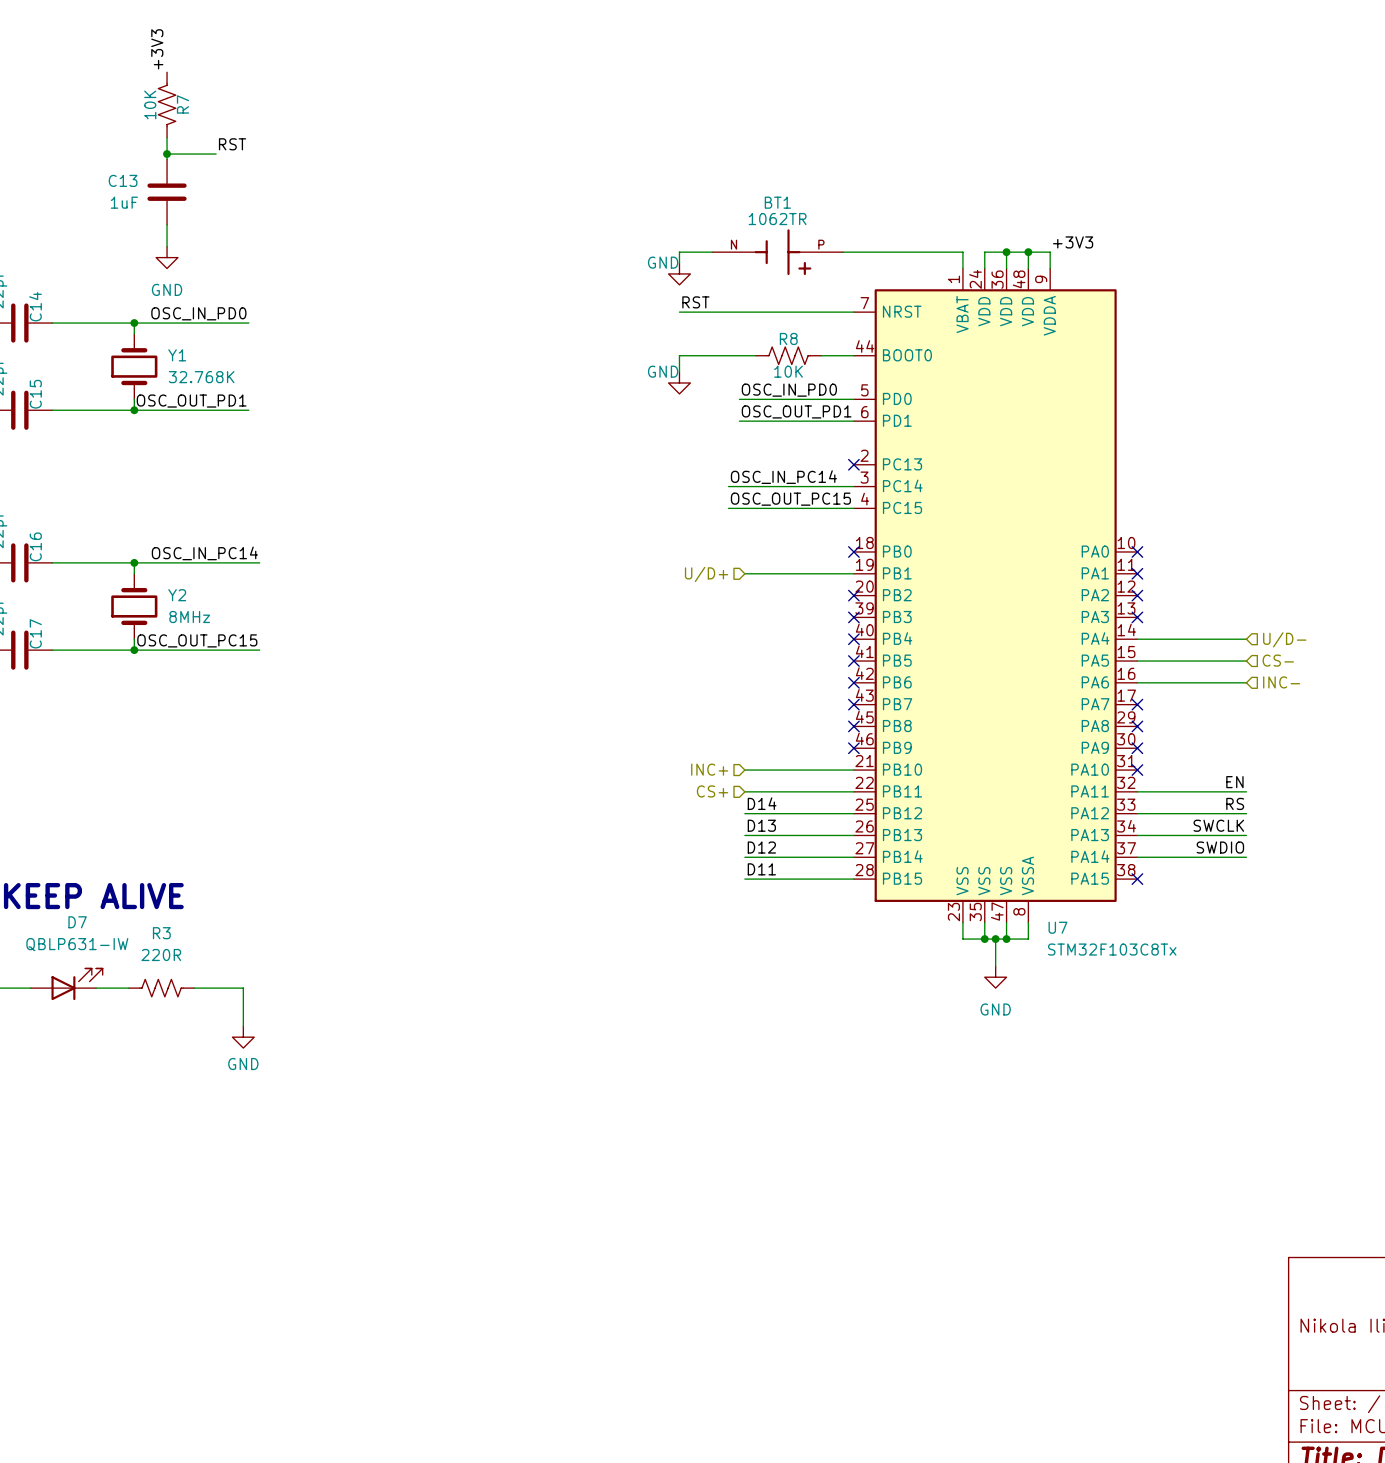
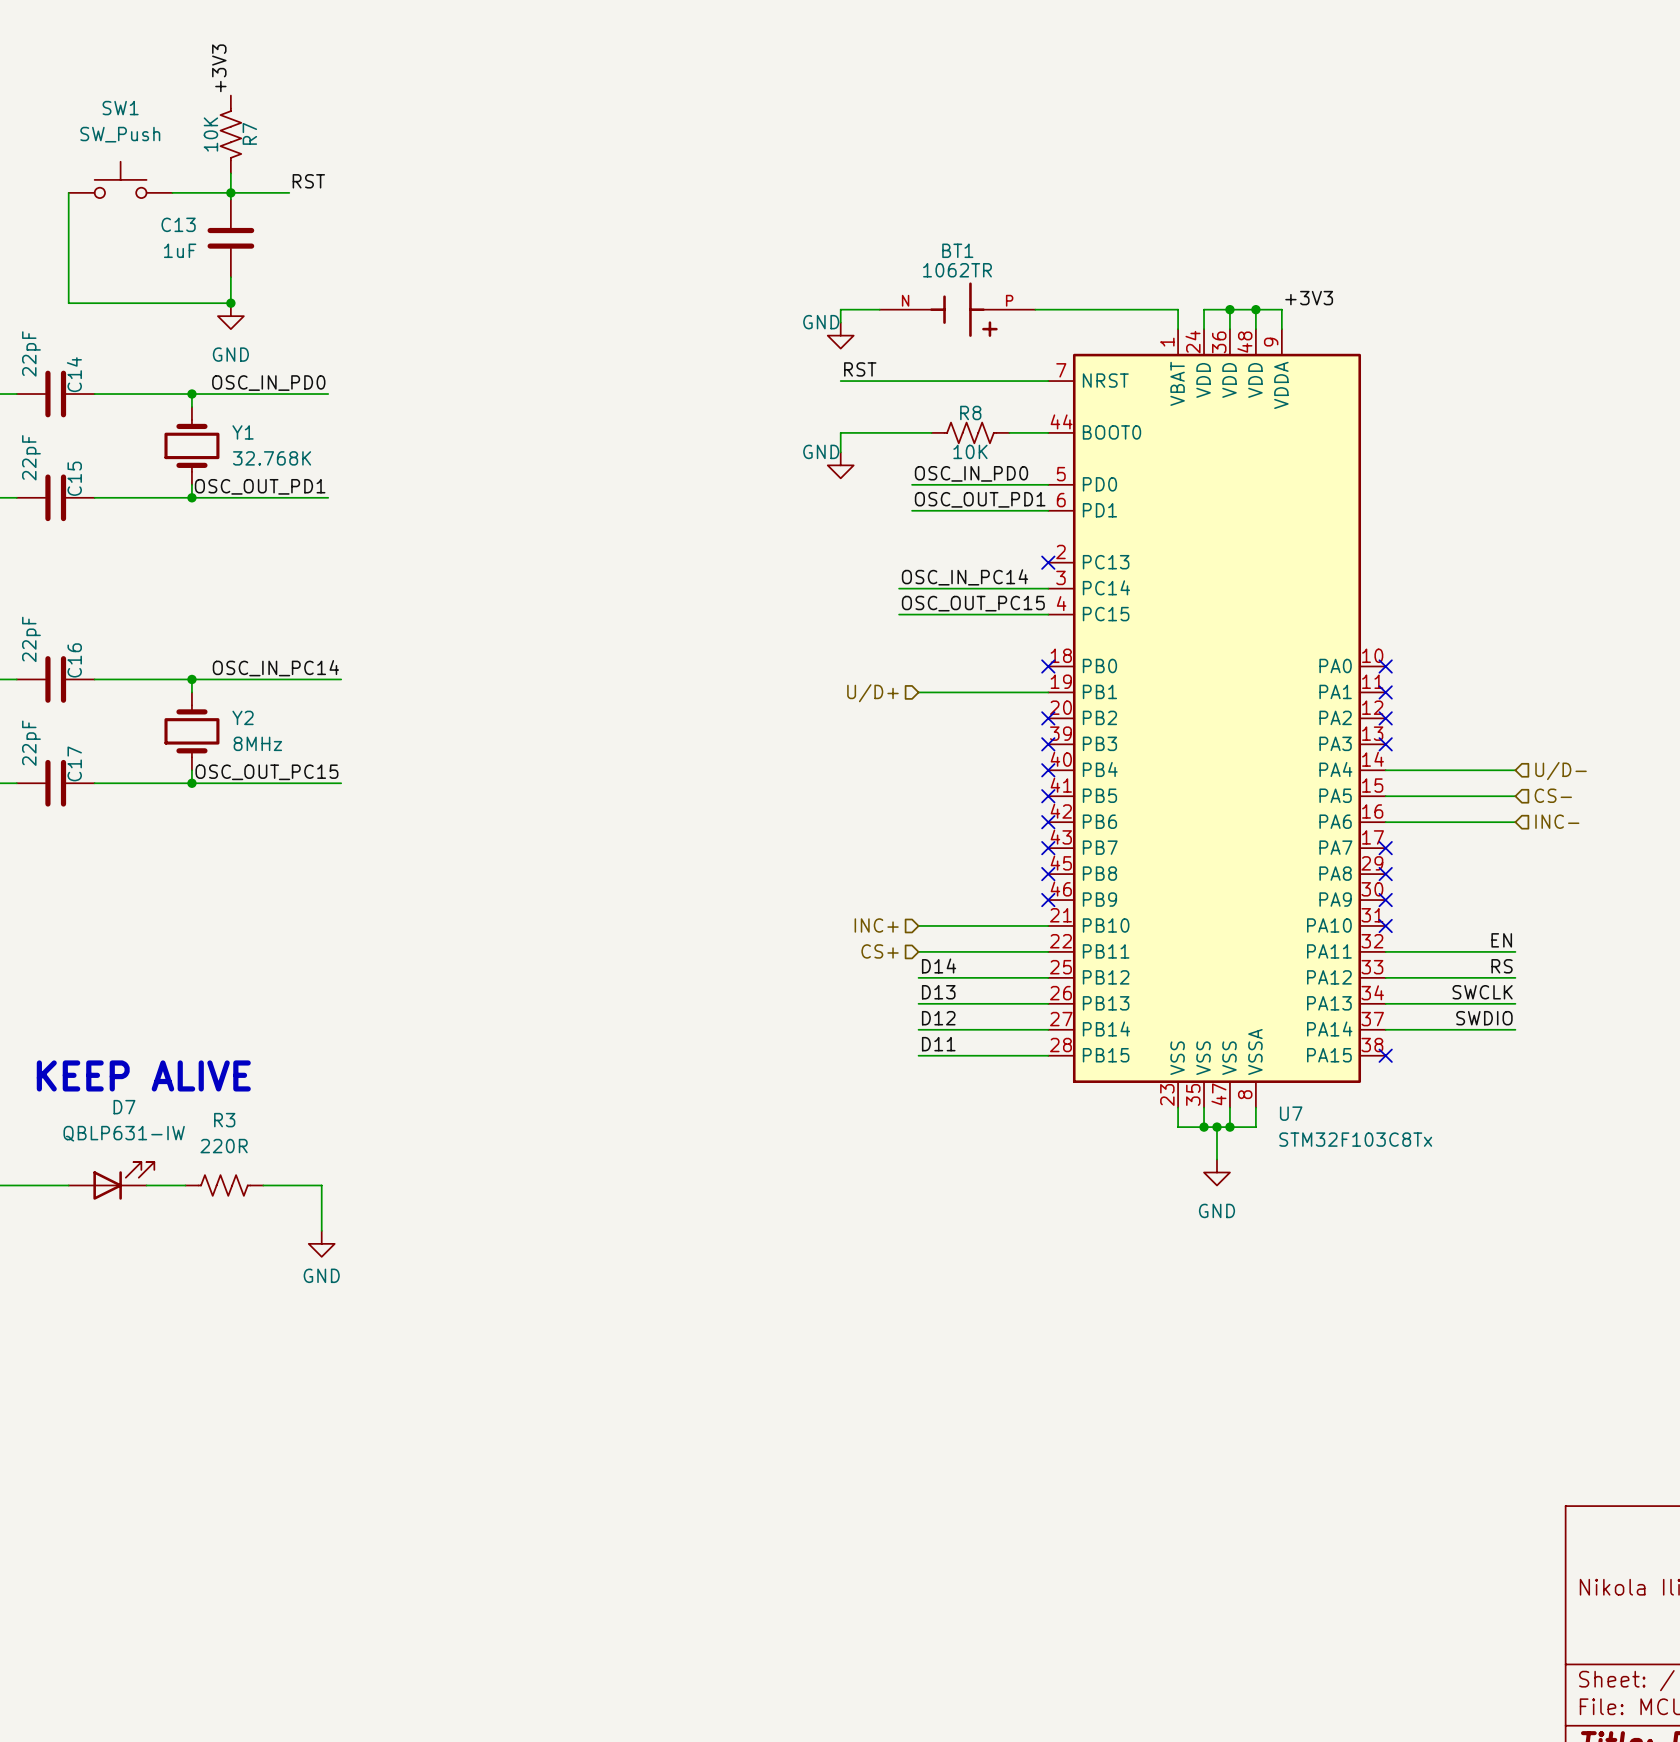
SW1: none -> SW_Push (120, 179)
wire: none -> (68, 192) (68, 303) (230, 303)
wire: none -> (172, 192) (230, 192)
junction: none -> (230, 303)

